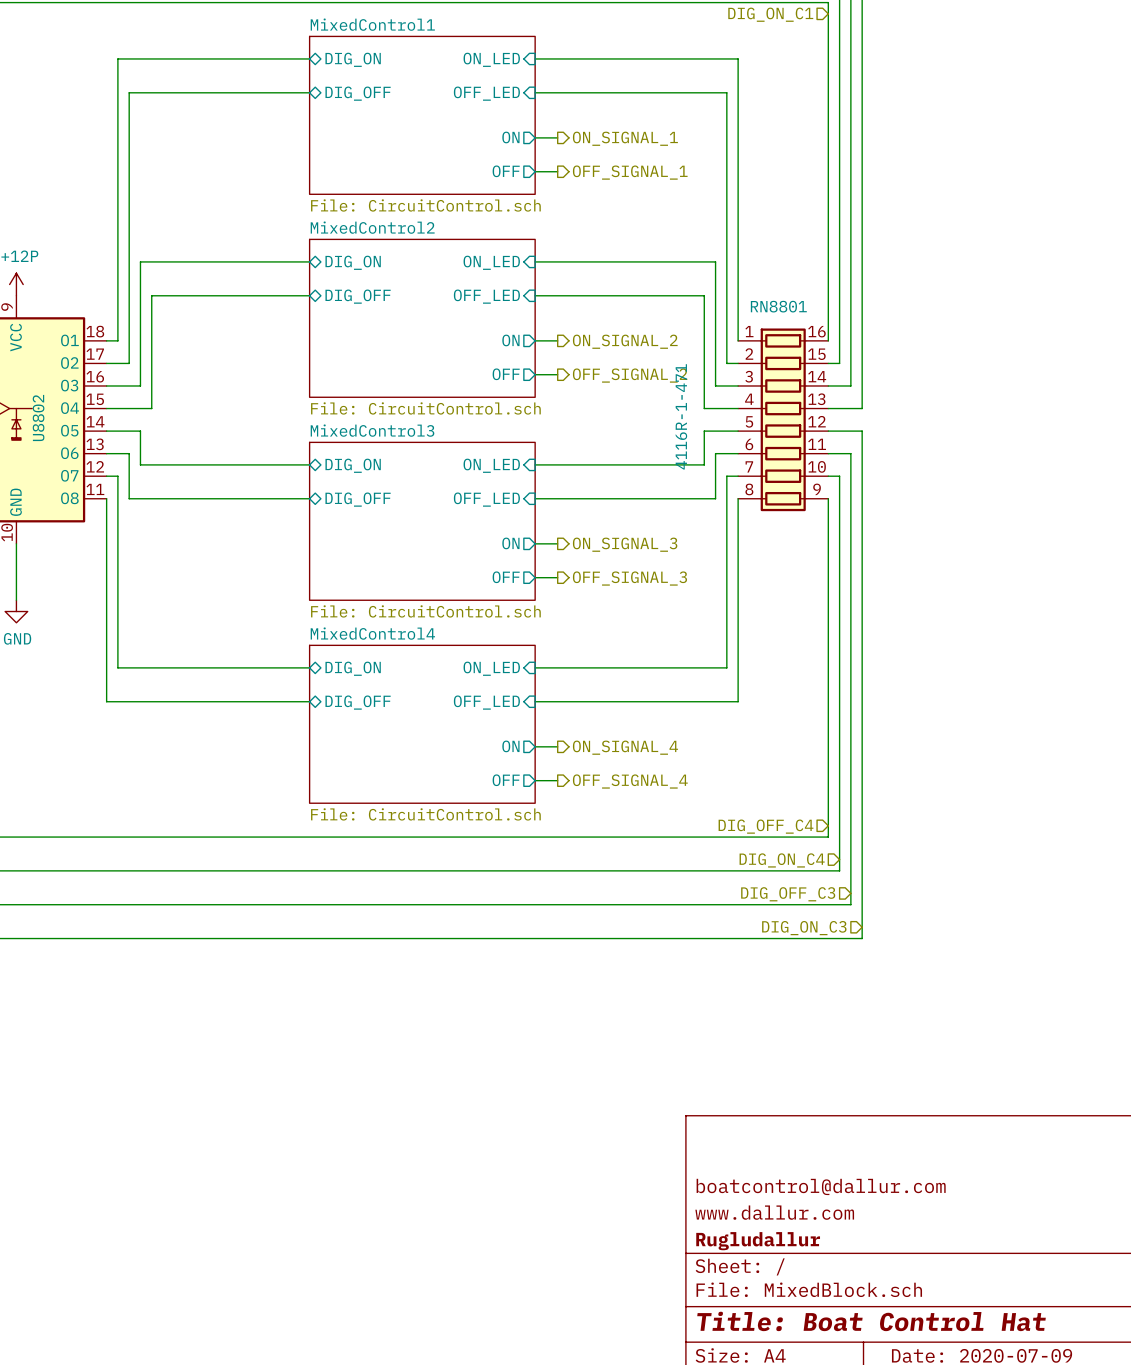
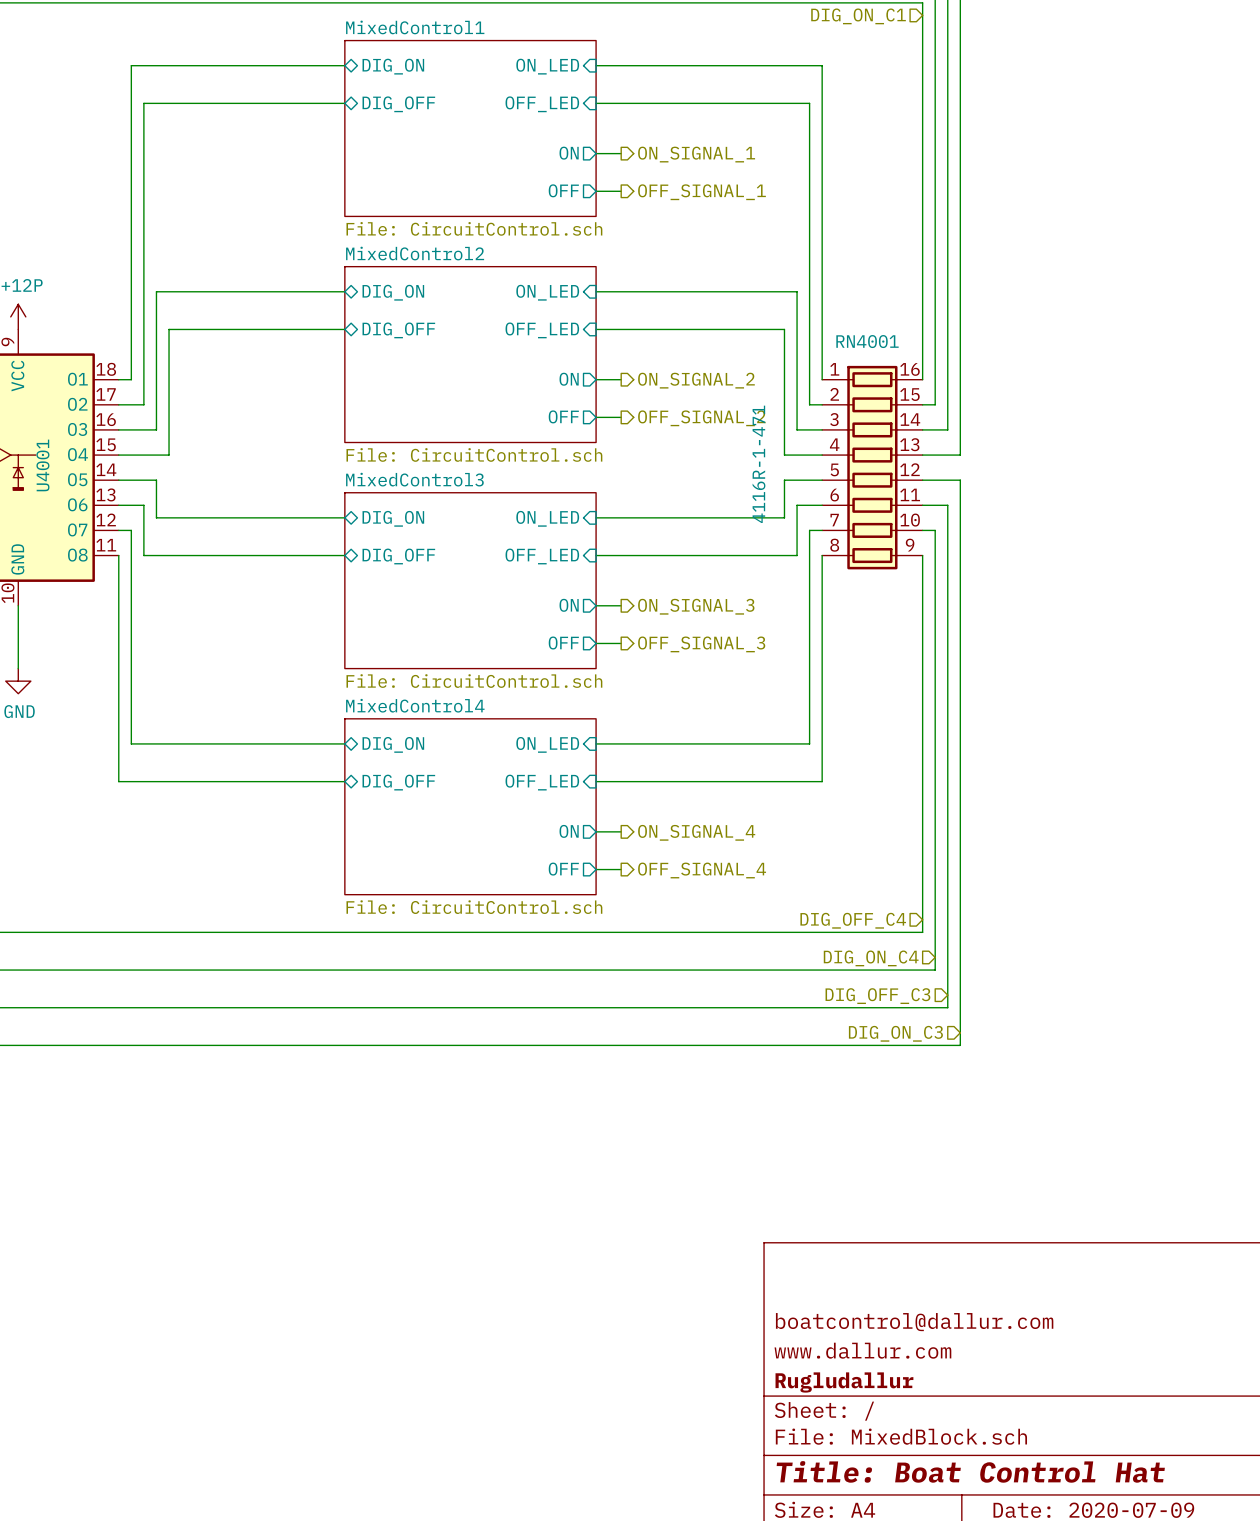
RN8801 name: RN8801 (778, 306) -> RN4001 (867, 341)
U8802 name: U8802 (38, 418) -> U4001 (42, 465)

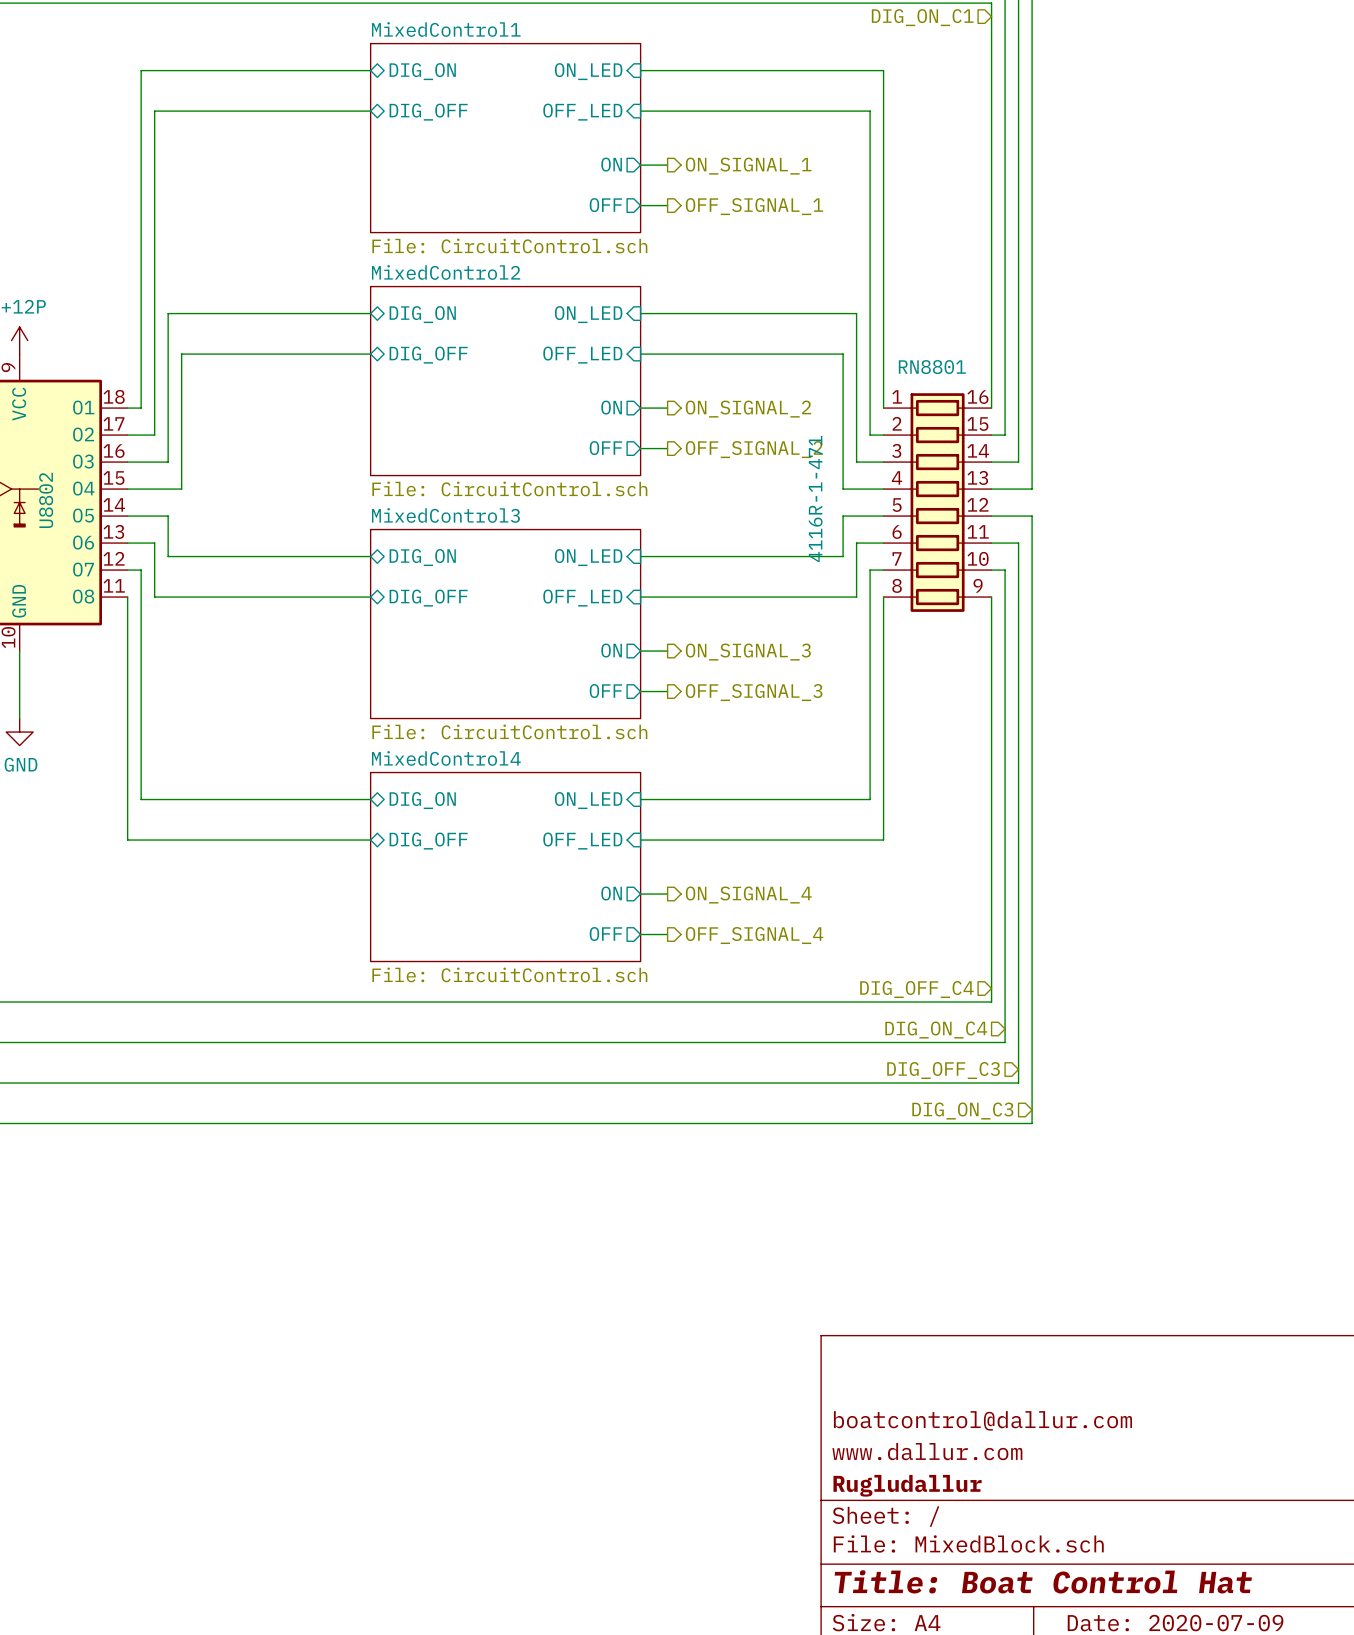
RN4001 name: RN4001 (867, 341) -> RN8801 (932, 367)
U4001 name: U4001 (42, 465) -> U8802 (46, 500)

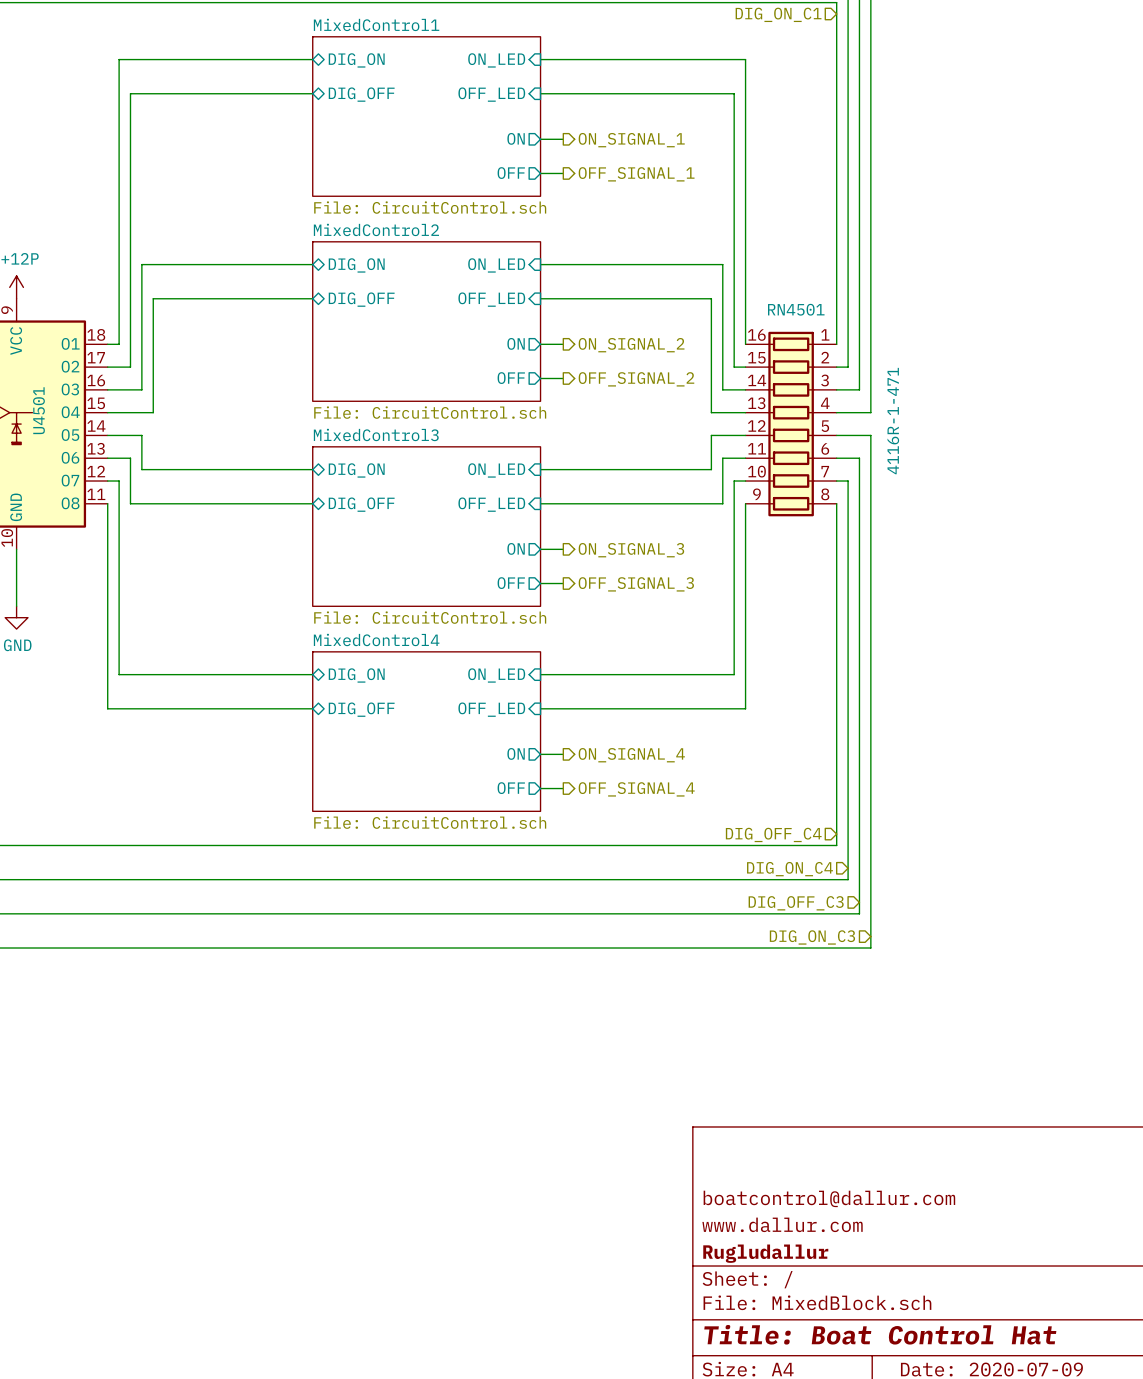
RN8801 name: RN8801 (932, 367) -> RN4501 (796, 309)
U8802 name: U8802 (46, 500) -> U4501 (38, 410)
RN8801 flip: as is (937, 502) -> left-right (791, 424)

